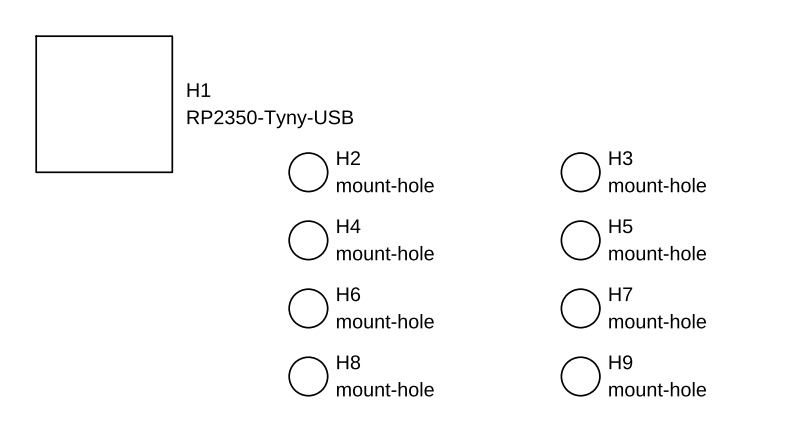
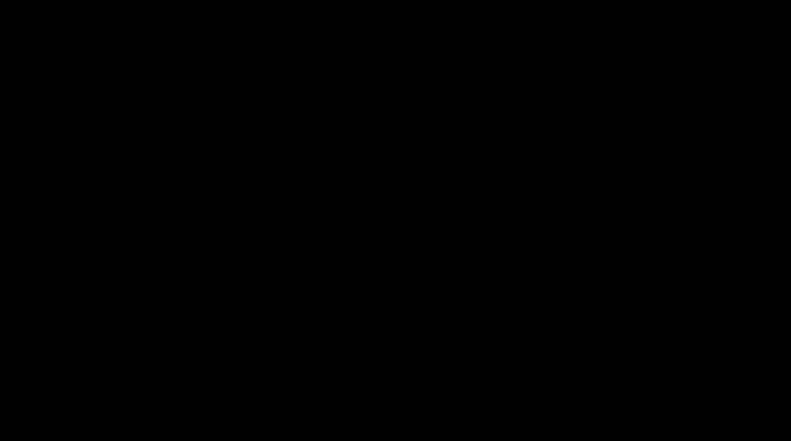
H1: RP2350-Tyny-USB (104, 104) -> none
H2: mount-hole (308, 172) -> none
H3: mount-hole (580, 172) -> none
H4: mount-hole (308, 240) -> none
H5: mount-hole (580, 240) -> none
H6: mount-hole (308, 308) -> none
H7: mount-hole (580, 308) -> none
H8: mount-hole (308, 376) -> none
H9: mount-hole (580, 376) -> none

